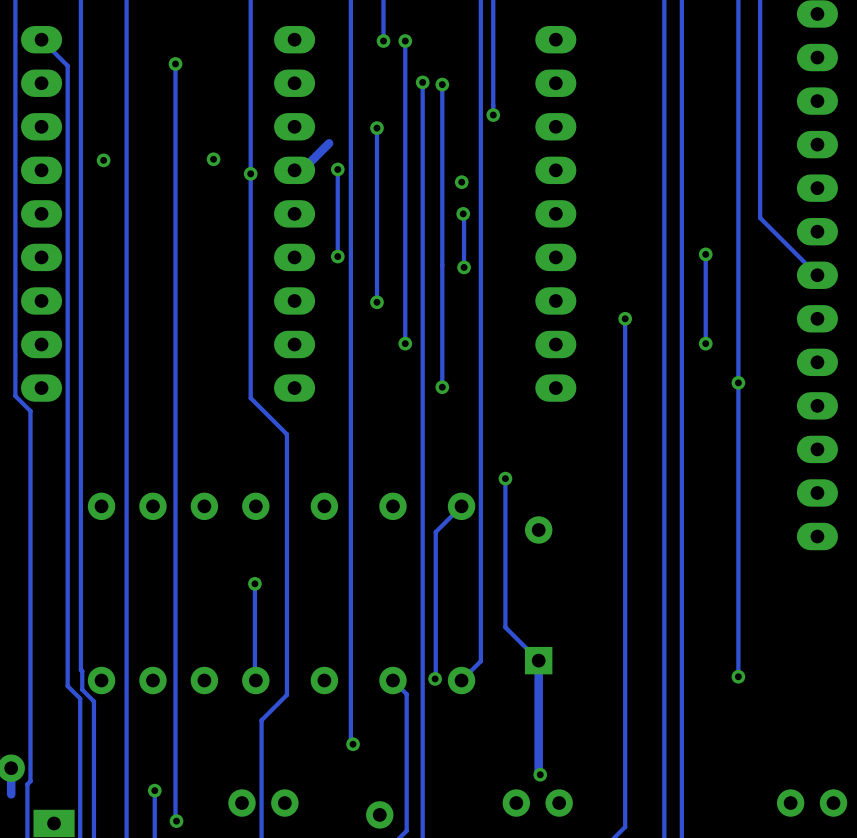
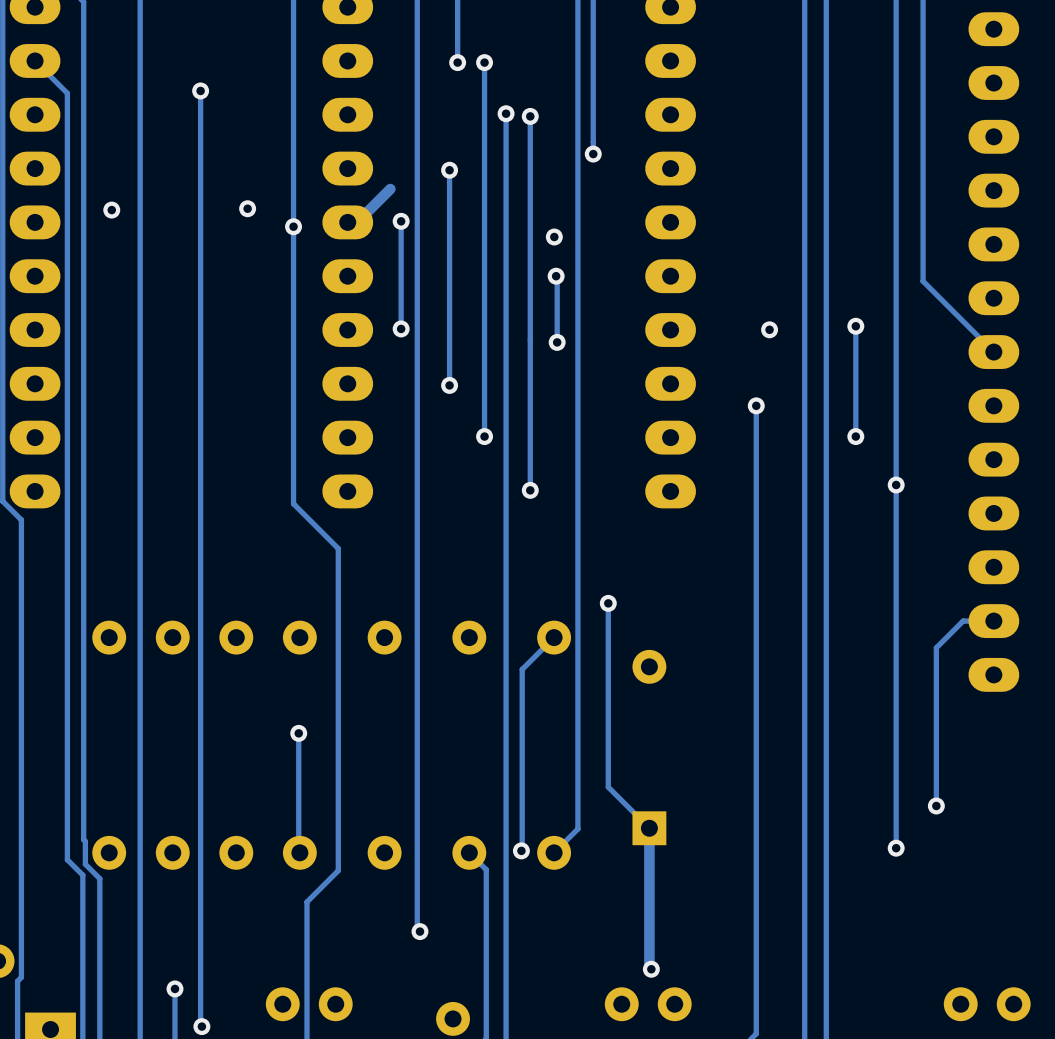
via: none -> (769, 329)
track: none -> (993, 621) (963, 621) (936, 647) (936, 805)
via: none -> (936, 805)

